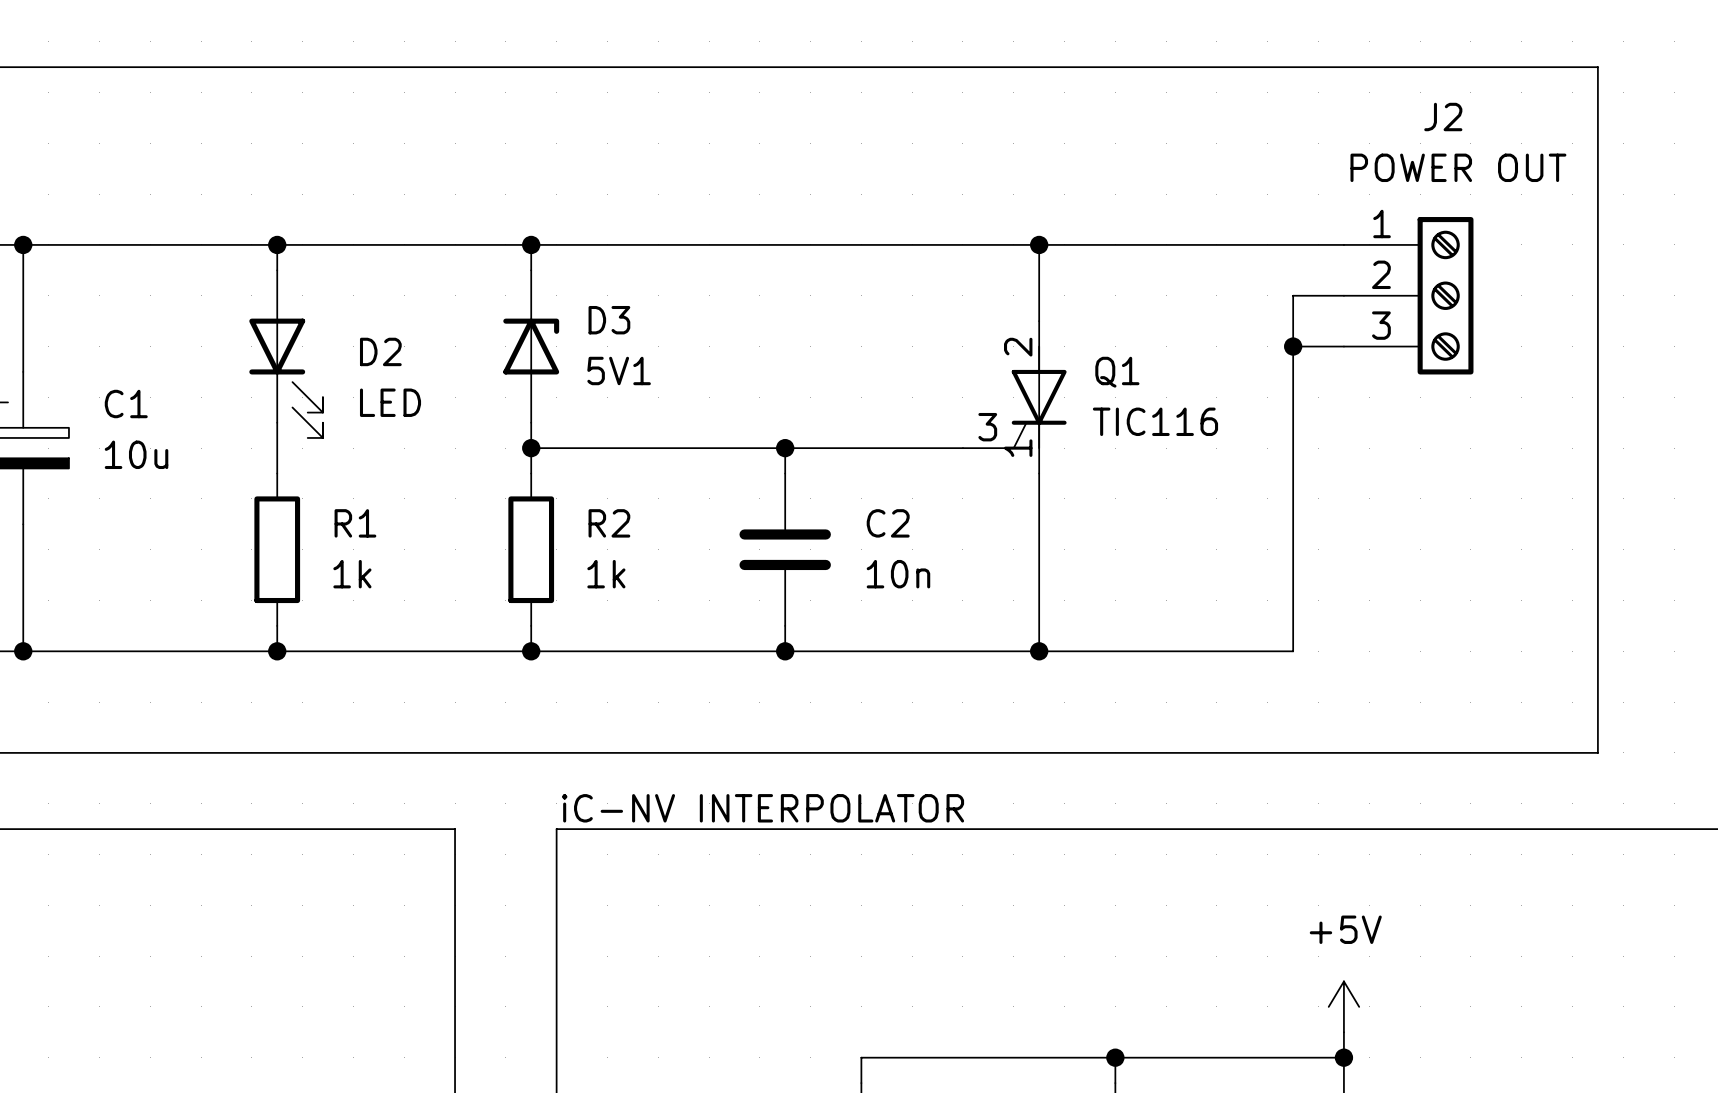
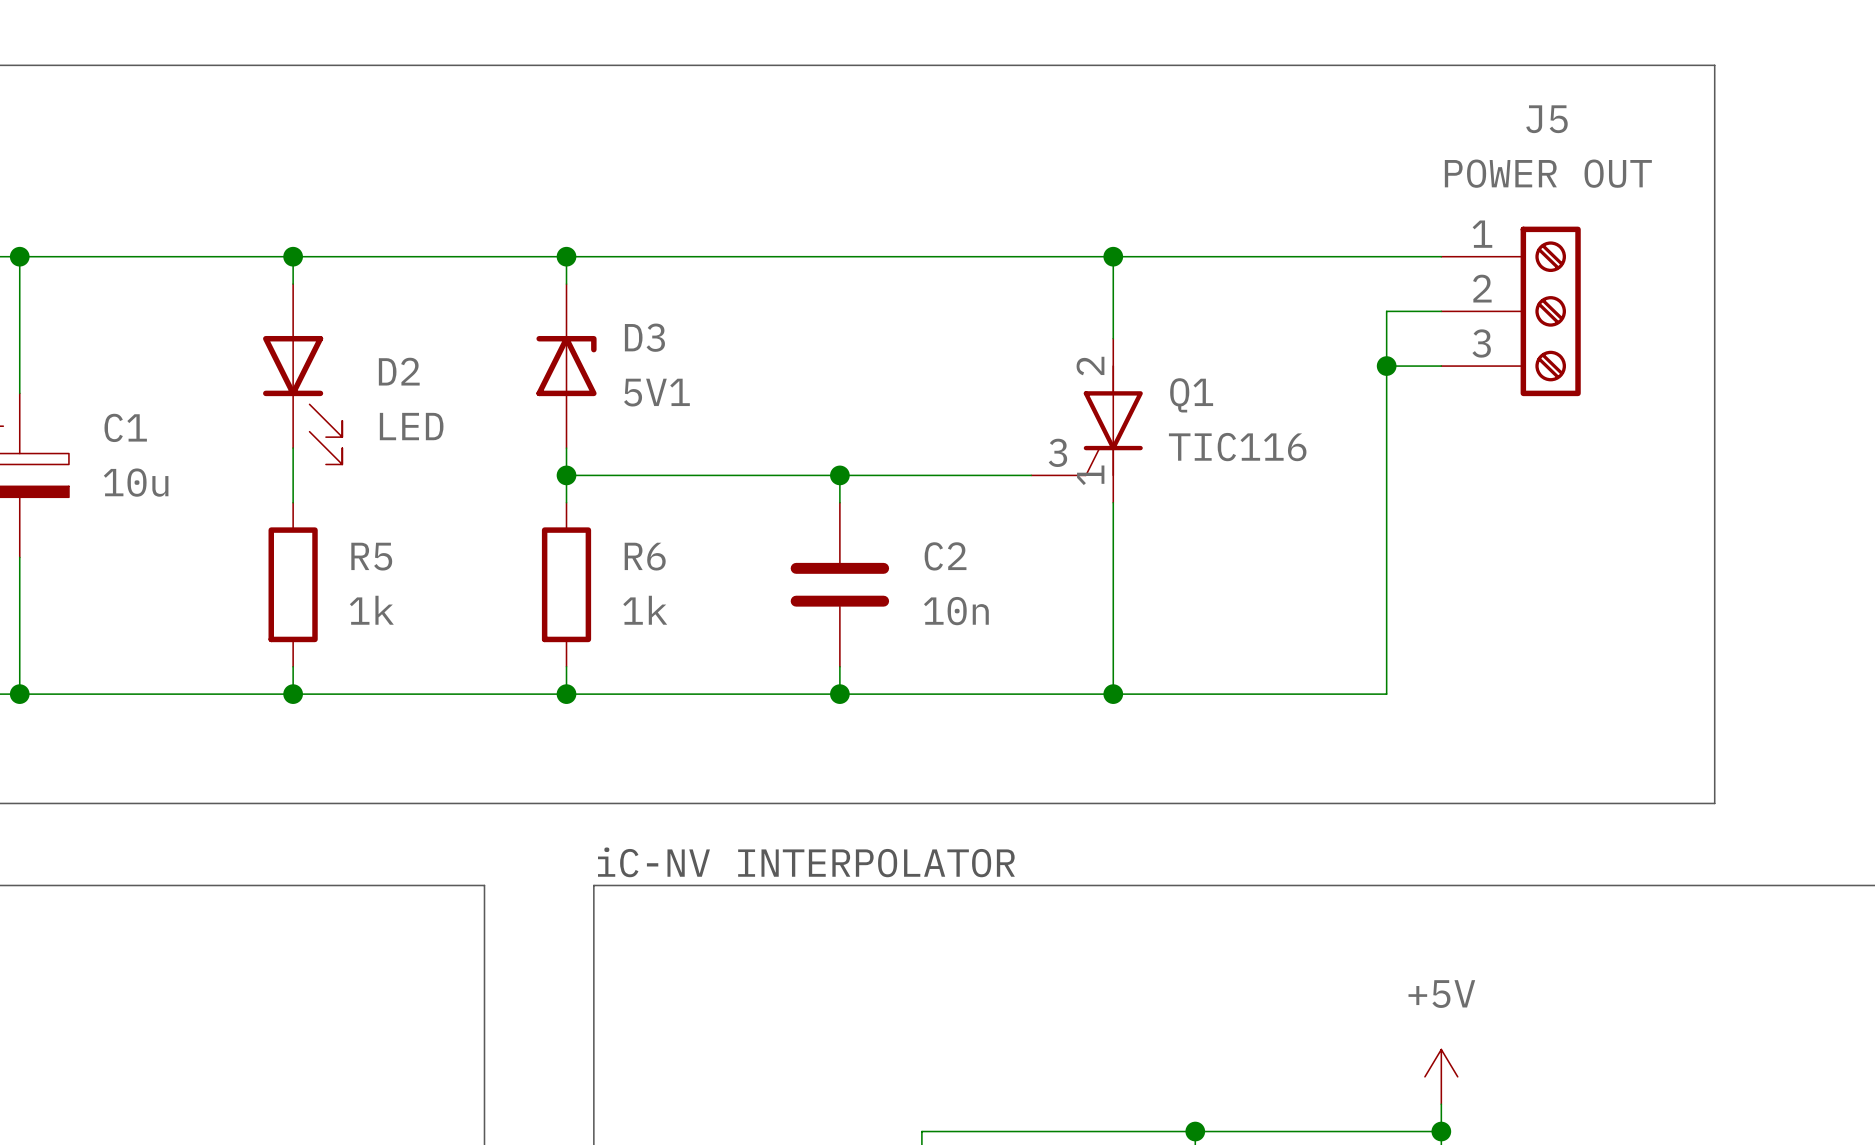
J2 name: J2 (1443, 117) -> J5 (1546, 119)
R1 name: R1 (355, 523) -> R5 (371, 556)
R2 name: R2 (609, 523) -> R6 (645, 556)

